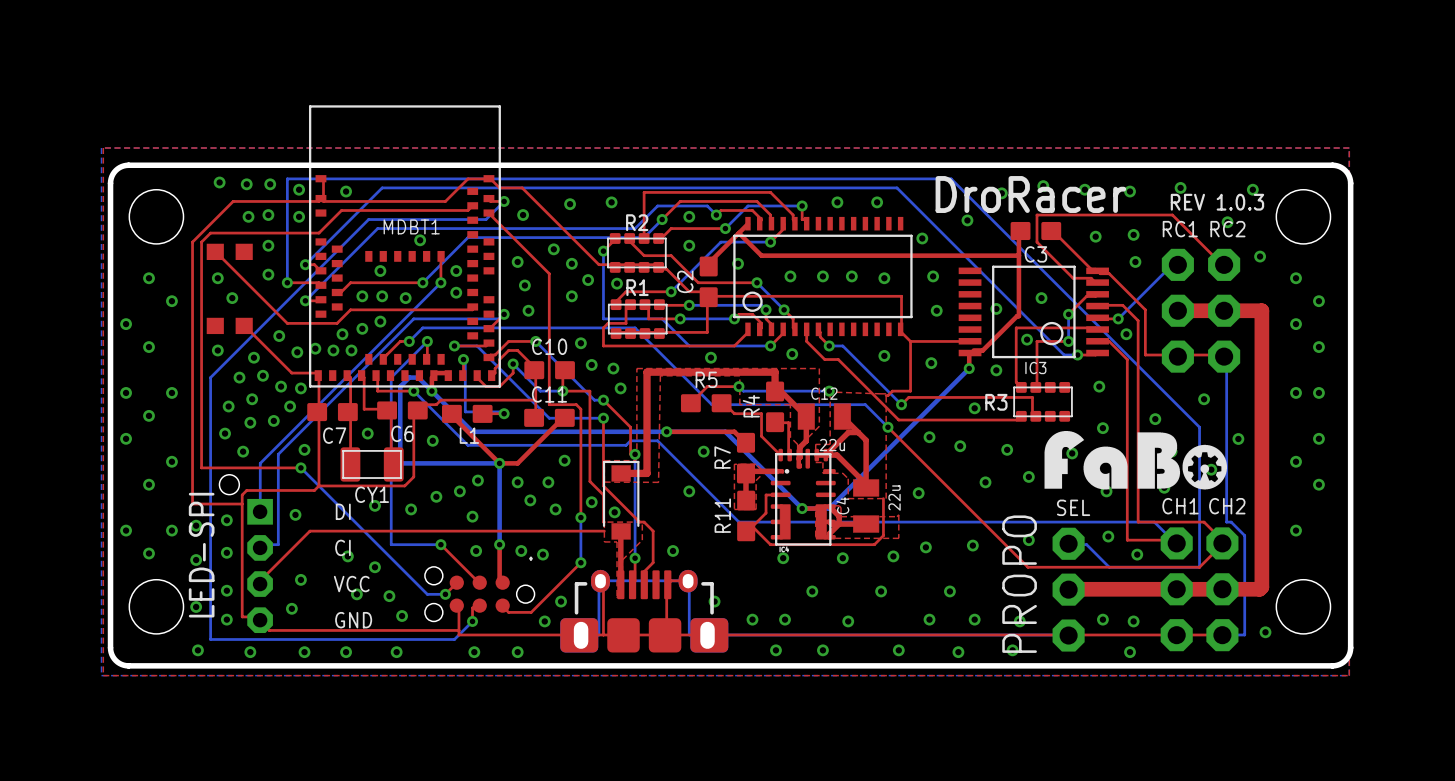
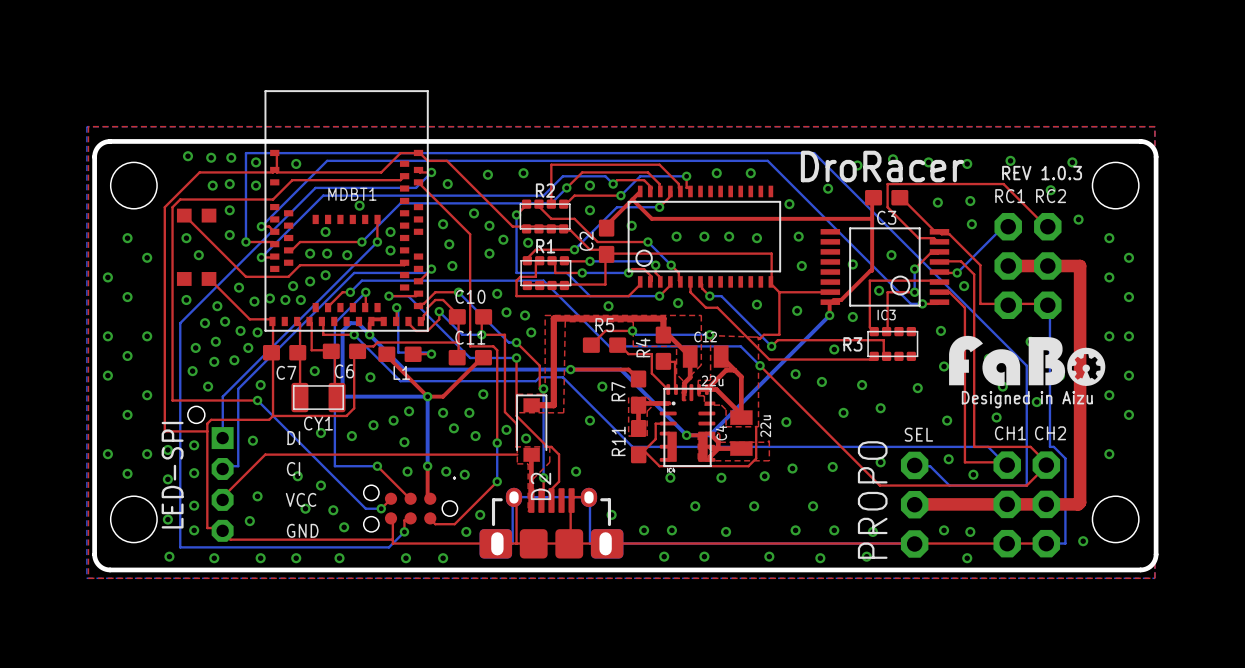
drawing position: (1135, 460) -> (1027, 360)
text: none -> Designed in Aizu (1027, 399)
D2 name: none -> D2 (540, 486)

